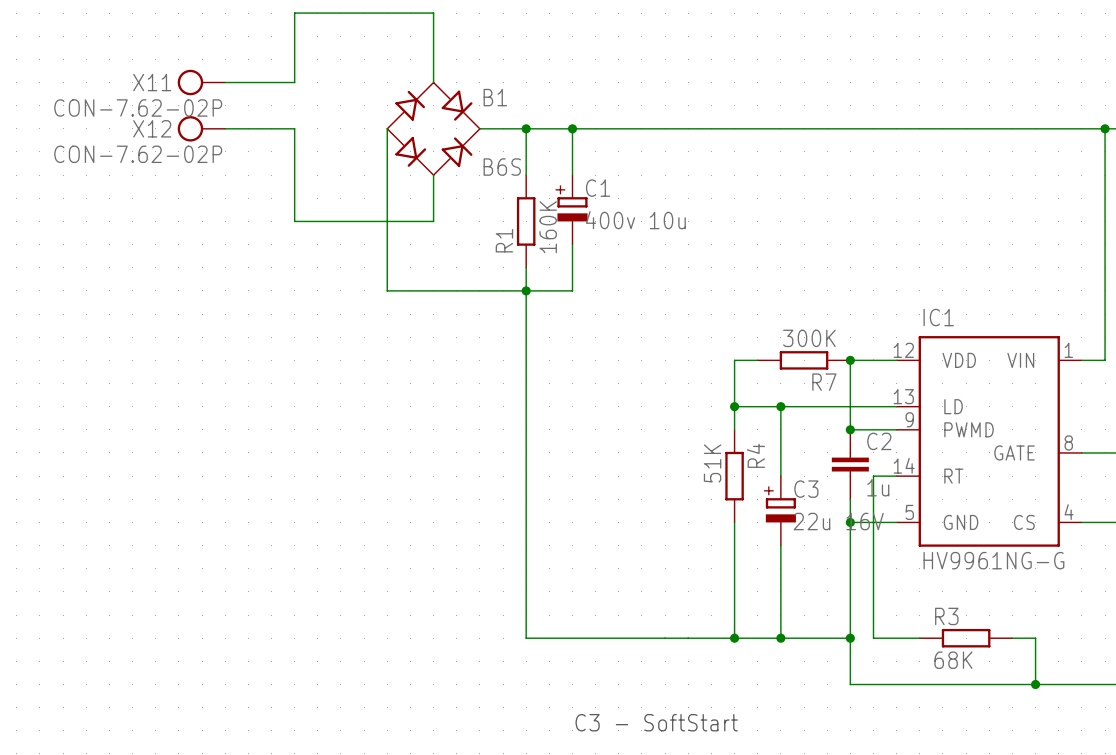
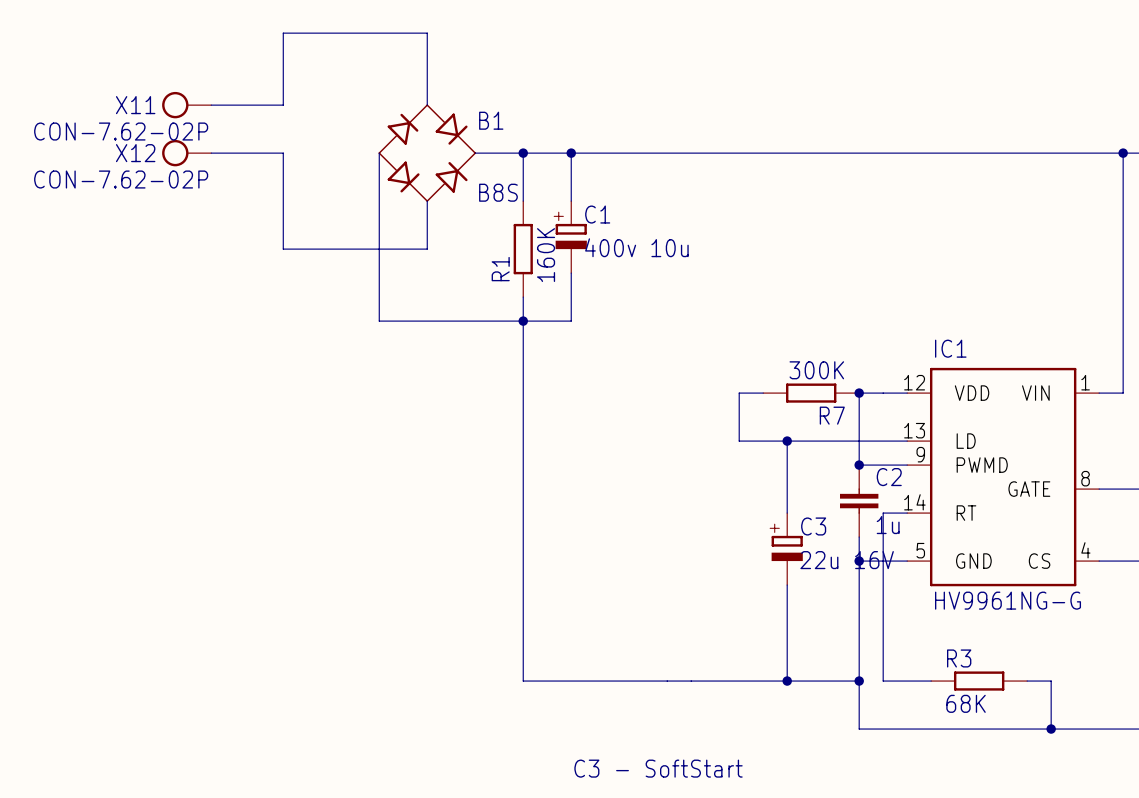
B1 value: B6S (502, 167) -> B8S (498, 192)
wire: (734, 406) (734, 429) -> none
junction: (734, 406) -> none
R4: 51K (734, 476) -> none
wire: (734, 522) (734, 638) -> none
junction: (734, 638) -> none

